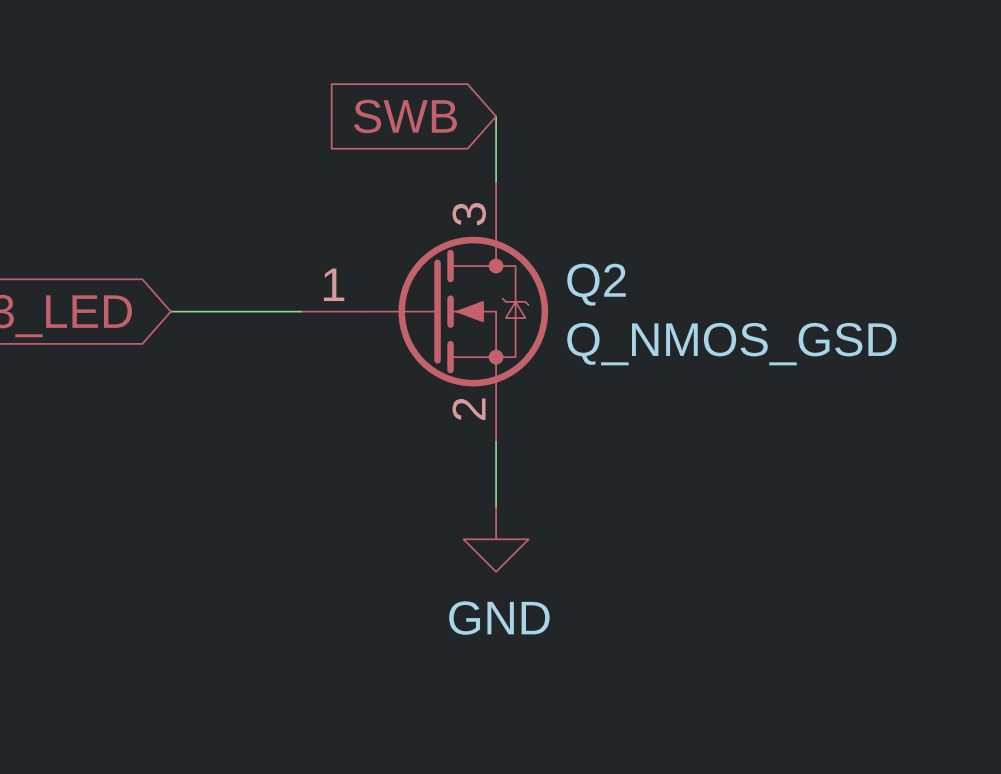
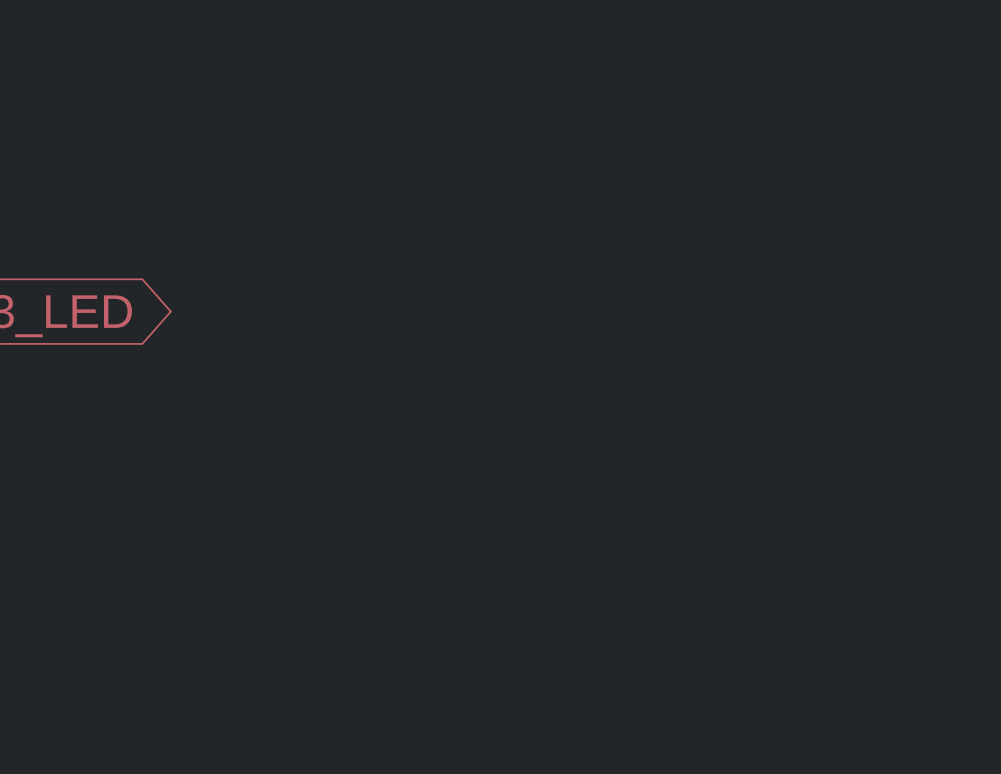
global label: SWB (405, 116) -> none
wire: (496, 116) (496, 181) -> none
wire: (170, 311) (300, 311) -> none
Q2: Q_NMOS_GSD (424, 311) -> none
wire: (496, 441) (496, 506) -> none
power symbol: GND (496, 539) -> none

